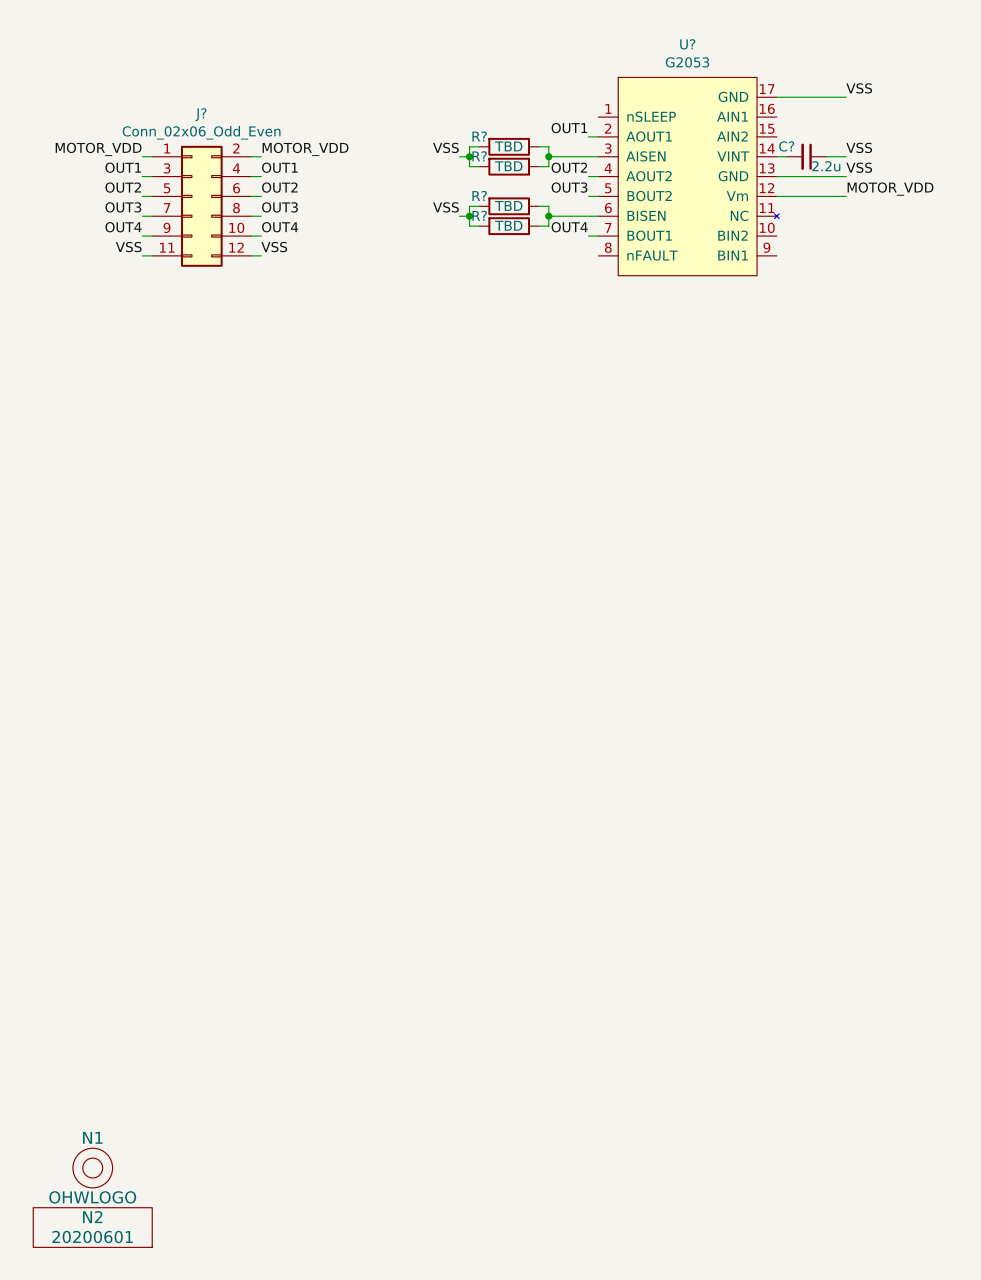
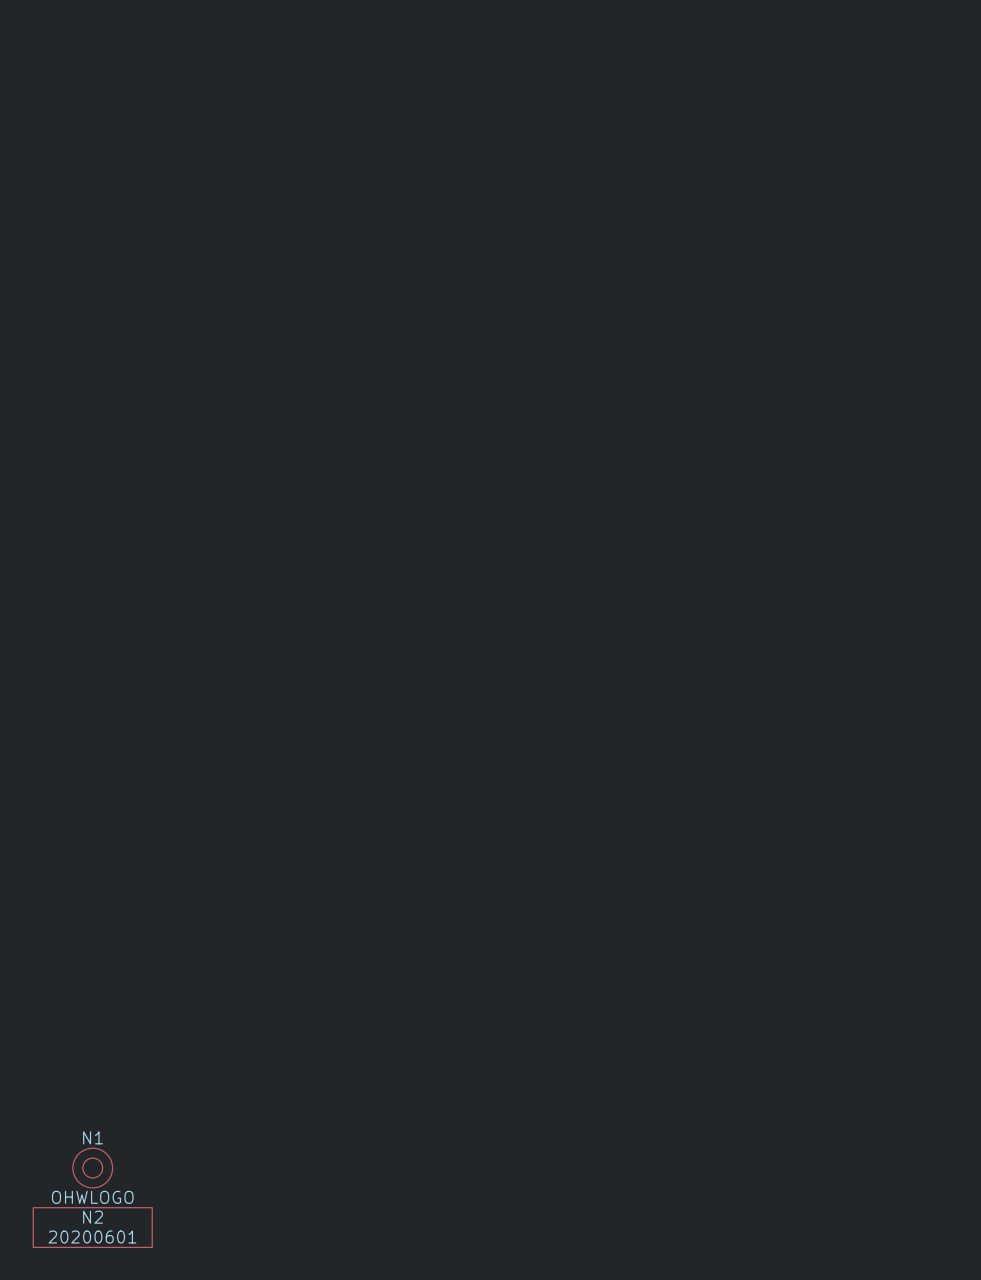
label: VSS (859, 88) -> none
wire: (776, 97) (846, 97) -> none
label: OUT1 (569, 128) -> none
wire: (588, 136) (598, 136) -> none
wire: (479, 146) (469, 146) (469, 166) (479, 166) -> none
R?: TBD (509, 146) -> none
wire: (538, 146) (548, 146) (548, 166) (538, 166) -> none
label: VSS (445, 147) -> none
label: VSS (859, 147) -> none
label: MOTOR_VDD (98, 149) -> none
label: MOTOR_VDD (305, 149) -> none
wire: (142, 156) (152, 156) -> none
wire: (251, 156) (261, 156) -> none
wire: (459, 156) (469, 156) -> none
junction: (469, 156) -> none
wire: (548, 156) (598, 156) -> none
junction: (548, 156) -> none
wire: (776, 156) (786, 156) -> none
C?: 2.2u (806, 156) -> none
wire: (826, 156) (846, 156) -> none
R?: TBD (509, 166) -> none
label: OUT1 (123, 167) -> none
label: OUT1 (279, 167) -> none
label: OUT2 (569, 167) -> none
label: VSS (859, 167) -> none
wire: (142, 176) (152, 176) -> none
wire: (251, 176) (261, 176) -> none
wire: (588, 176) (598, 176) -> none
U?: G2053 (688, 176) -> none
wire: (776, 176) (846, 176) -> none
label: OUT2 (123, 187) -> none
label: OUT2 (279, 187) -> none
label: OUT3 (569, 187) -> none
label: MOTOR_VDD (890, 189) -> none
wire: (142, 196) (152, 196) -> none
wire: (251, 196) (261, 196) -> none
wire: (588, 196) (598, 196) -> none
wire: (776, 196) (846, 196) -> none
J?: Conn_02x06_Odd_Even (201, 206) -> none
wire: (479, 206) (469, 206) (469, 226) (479, 226) -> none
R?: TBD (509, 206) -> none
wire: (538, 206) (548, 206) (548, 226) (538, 226) -> none
label: OUT3 (123, 207) -> none
label: OUT3 (279, 207) -> none
label: VSS (445, 207) -> none
wire: (142, 216) (152, 216) -> none
wire: (251, 216) (261, 216) -> none
wire: (459, 216) (469, 216) -> none
junction: (469, 216) -> none
wire: (548, 216) (598, 216) -> none
junction: (548, 216) -> none
R?: TBD (509, 226) -> none
label: OUT4 (123, 227) -> none
label: OUT4 (280, 227) -> none
label: OUT4 (569, 227) -> none
wire: (142, 236) (152, 236) -> none
wire: (251, 236) (261, 236) -> none
wire: (588, 236) (598, 236) -> none
label: VSS (128, 247) -> none
label: VSS (274, 247) -> none
wire: (142, 255) (152, 255) -> none
wire: (251, 255) (261, 255) -> none

